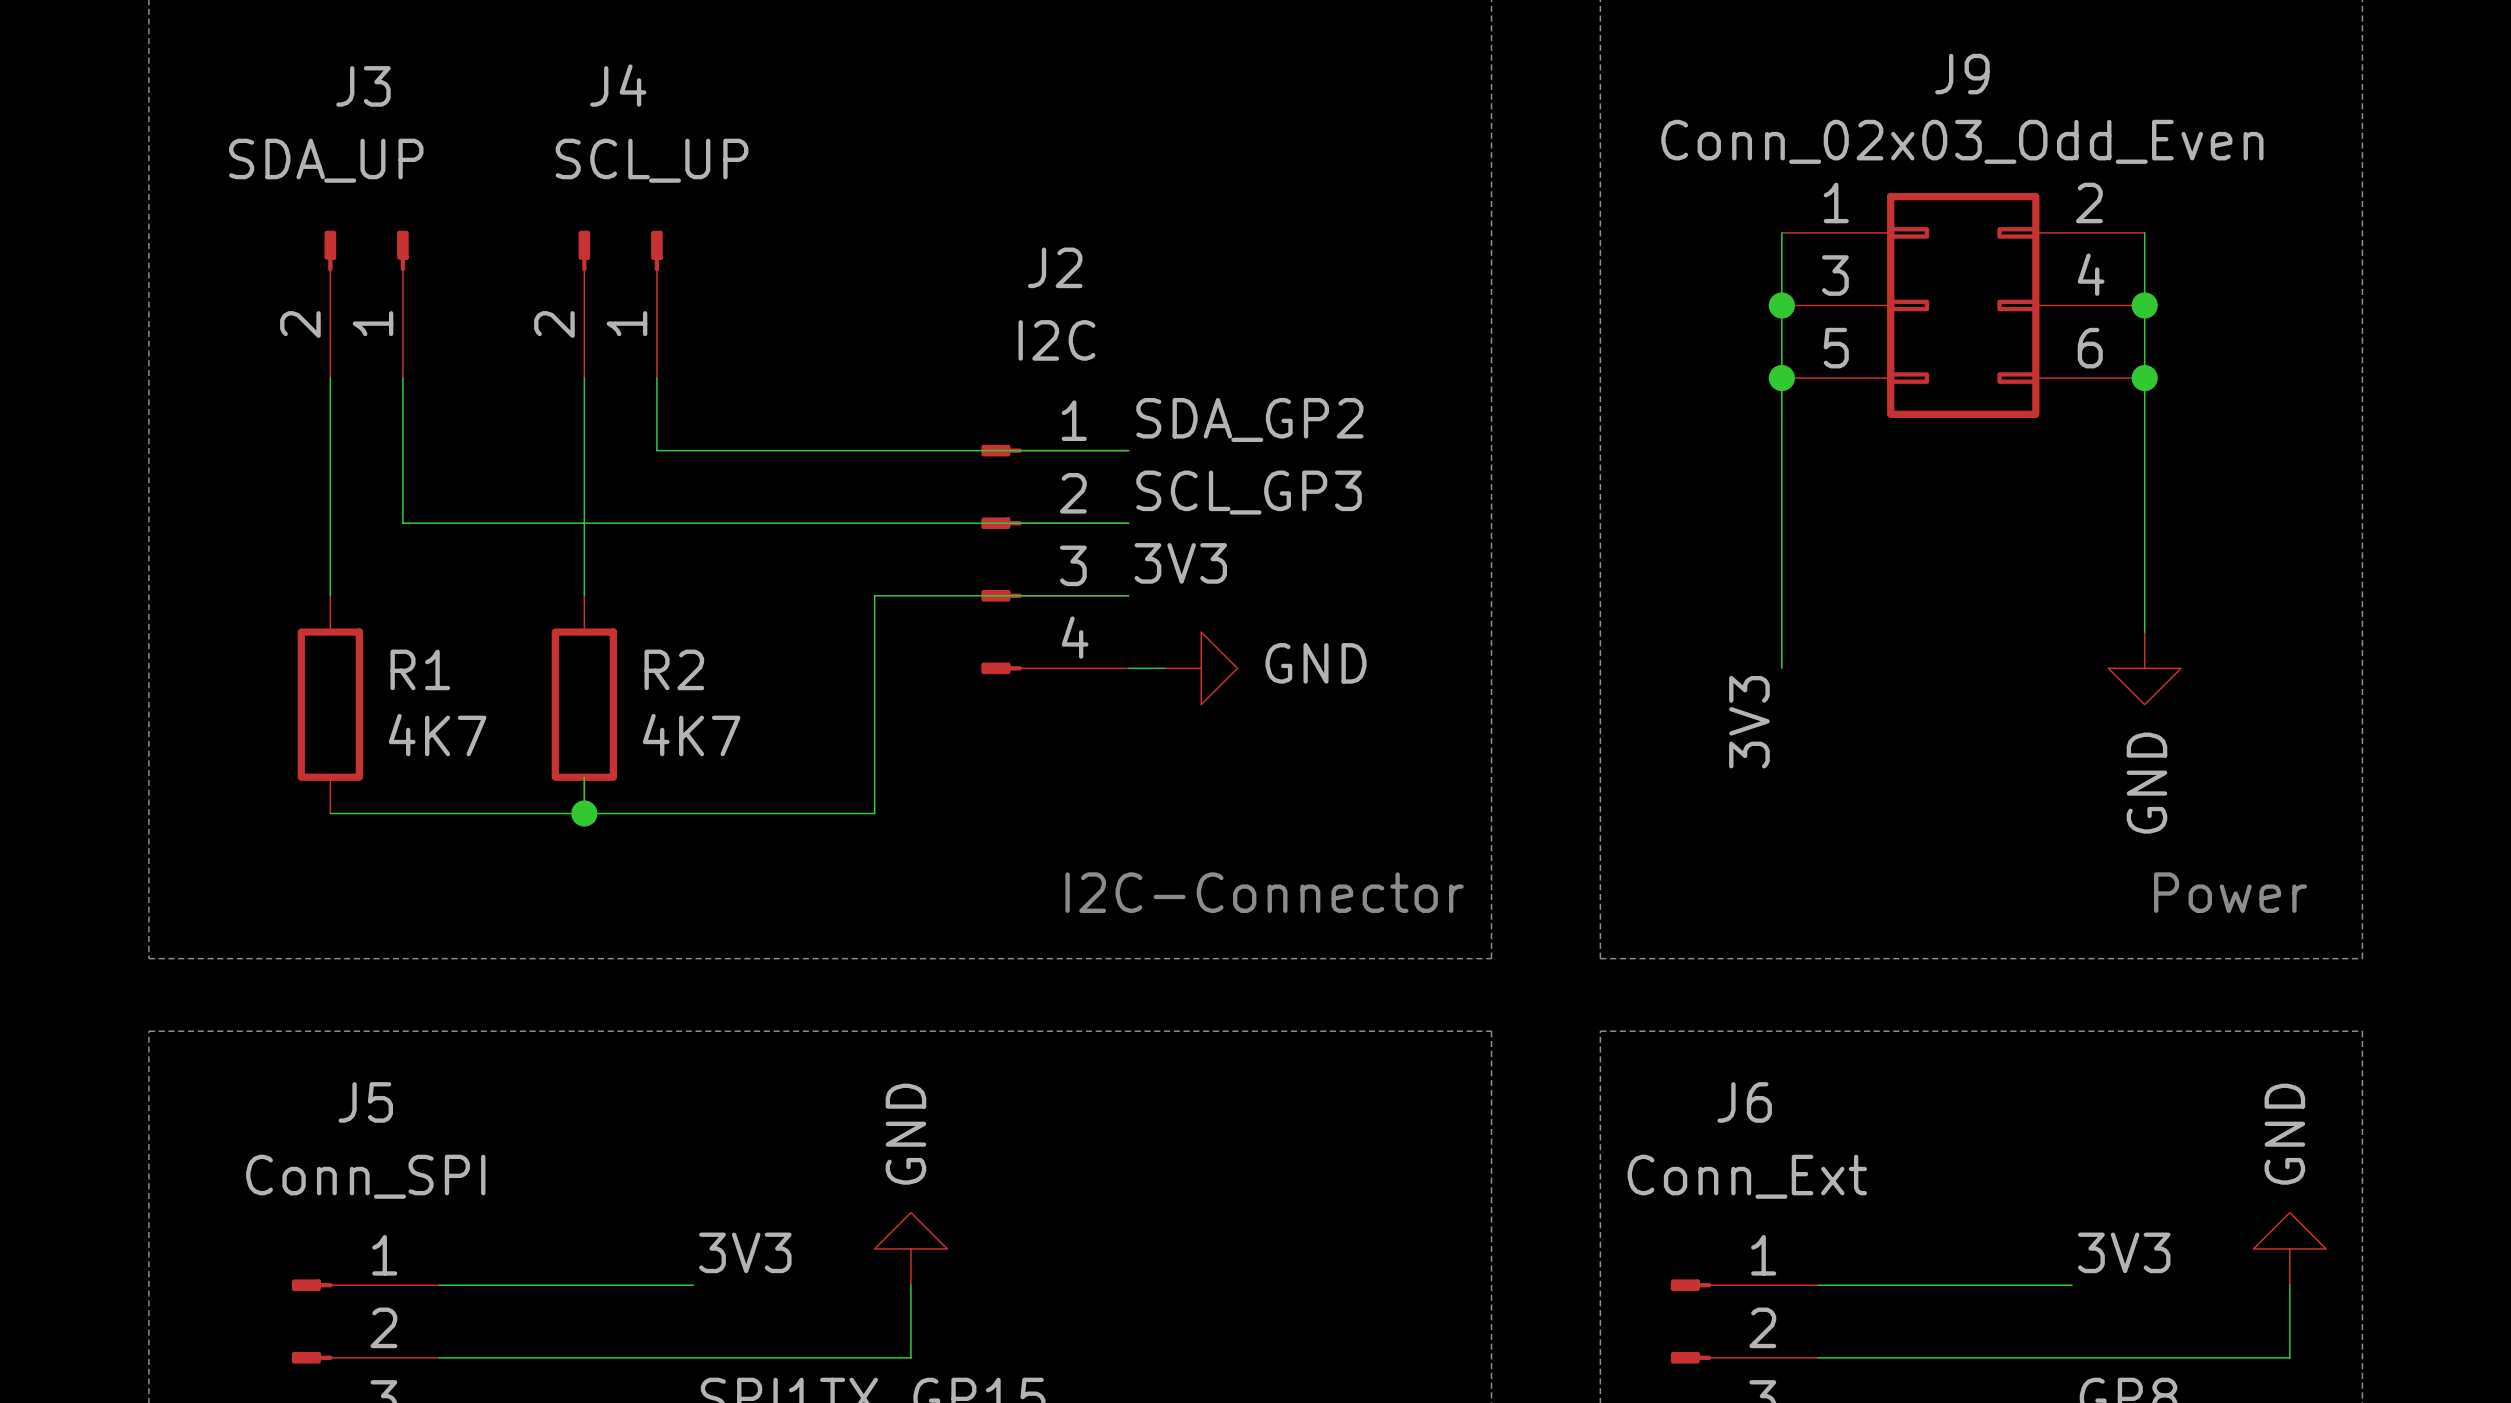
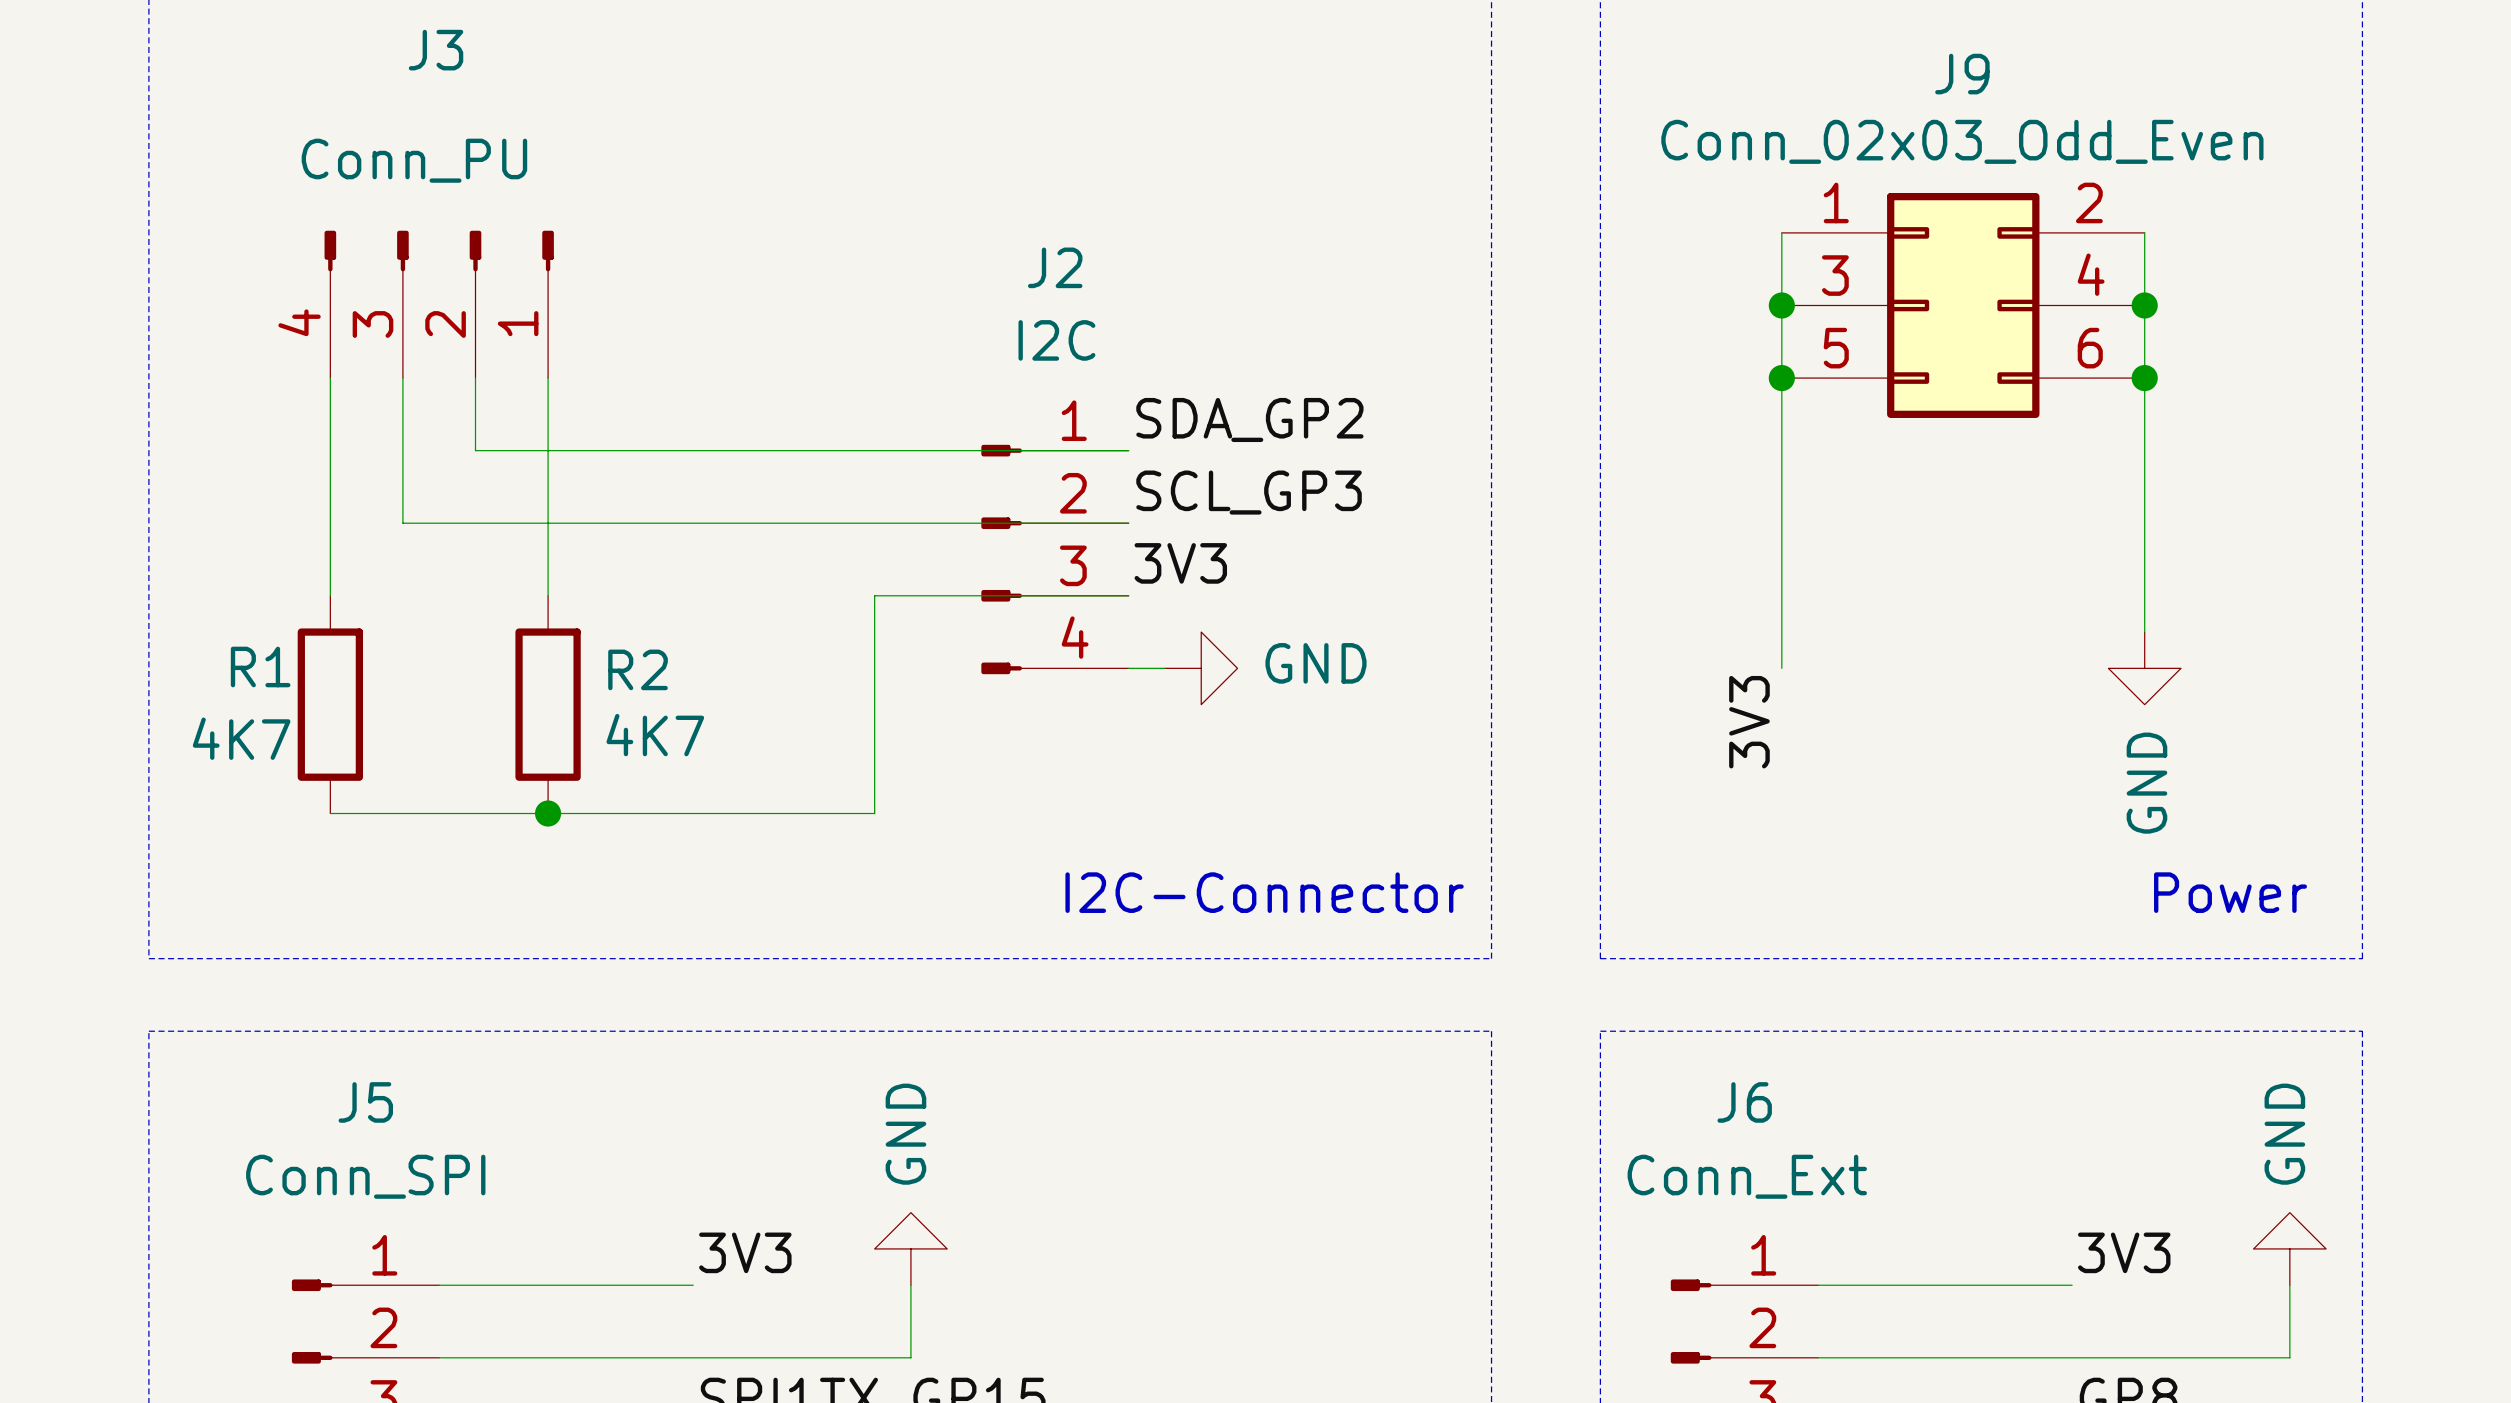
J3 value: SDA_UP (326, 160) -> Conn_PU (414, 160)
J3 symbol: [324, 230, 409, 379] -> [324, 230, 554, 379]
J4: SCL_UP (620, 304) -> none
wire: (584, 378) (584, 595) -> (548, 378) (548, 595)
wire: (656, 378) (656, 450) -> (475, 378) (475, 450) (656, 450)
R1 name position: R1 (420, 669) -> R1 (260, 667)
R2 position: (584, 704) -> (548, 704)
R1 value position: 4K7 (437, 735) -> 4K7 (241, 738)
wire: (584, 777) (584, 813) -> none
junction position: (584, 813) -> (548, 813)

